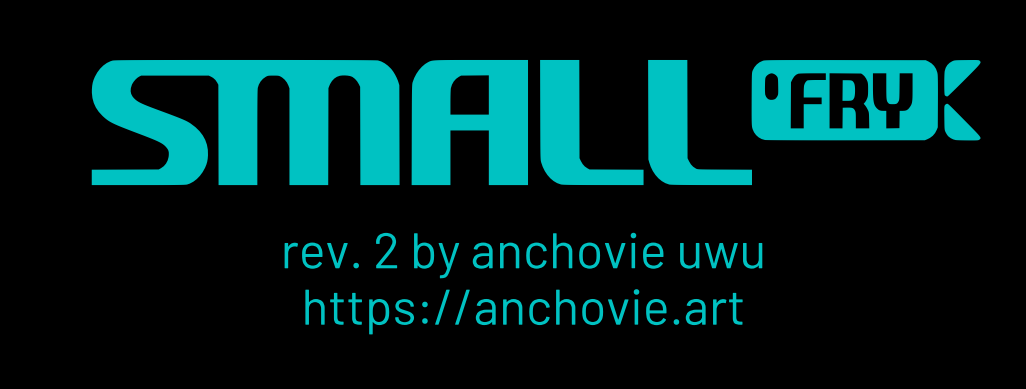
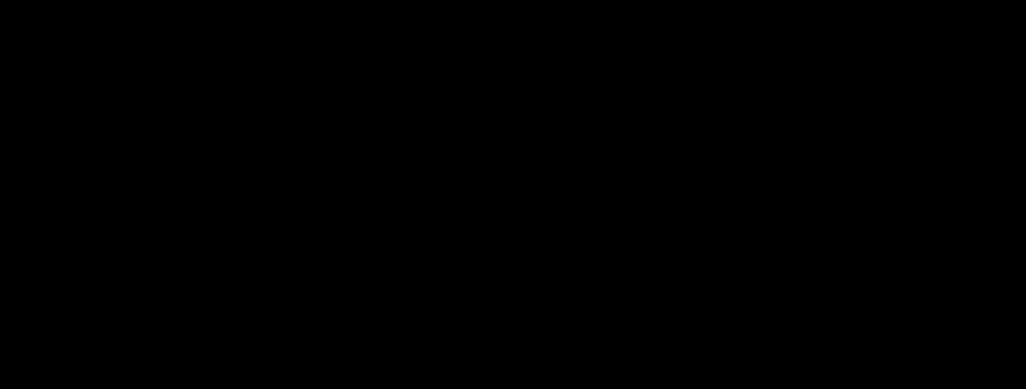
drawing: [91, 59, 981, 186] -> none
text: rev. 2 by anchovie uwu (523, 255) -> none
text: https://anchovie.art (524, 311) -> none

